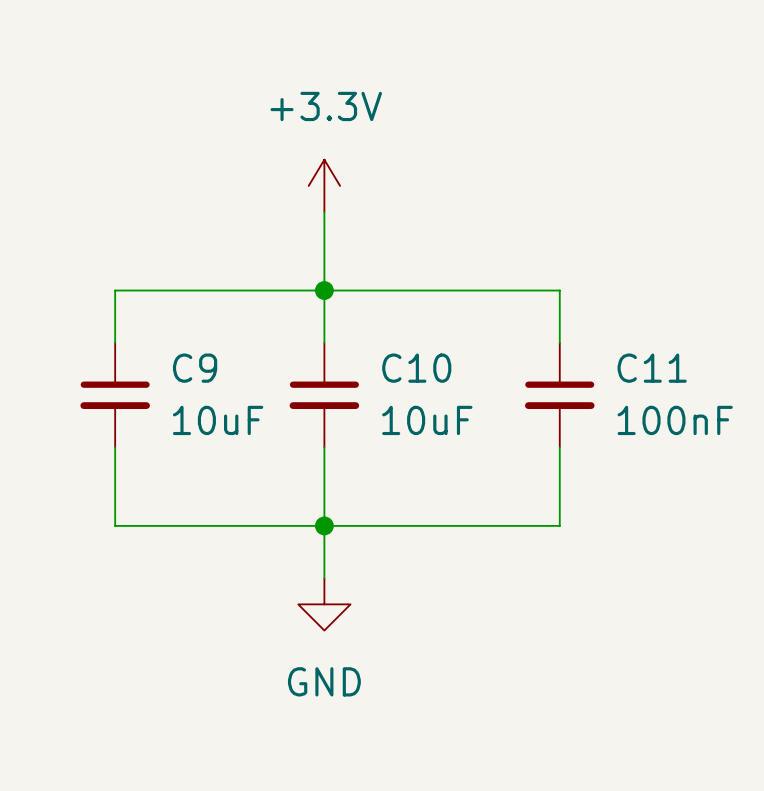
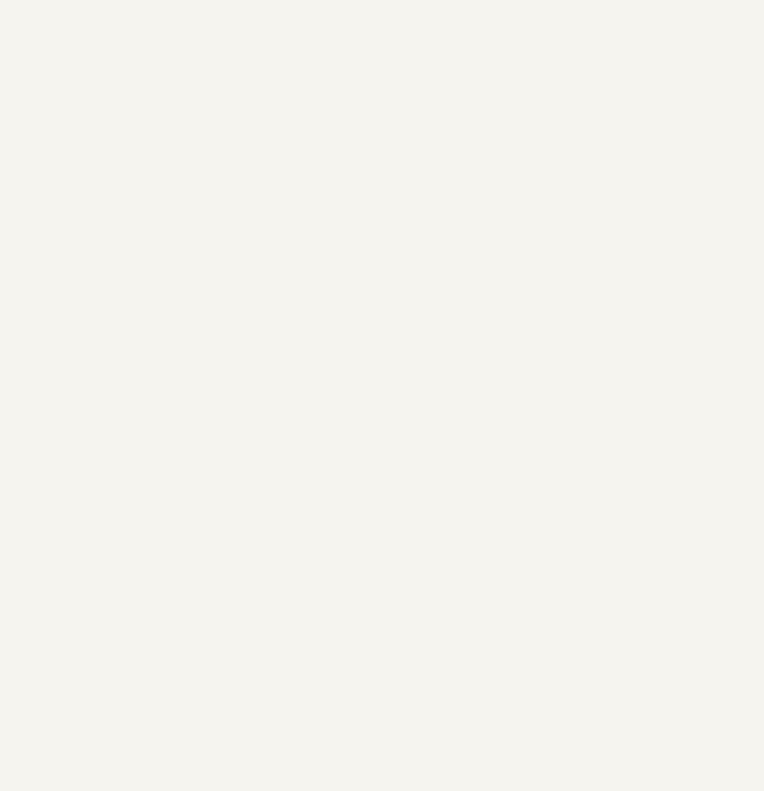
power symbol: +3.3V (324, 185) -> none
wire: (324, 212) (324, 342) -> none
junction: (324, 290) -> none
wire: (115, 342) (115, 290) (559, 290) (559, 342) -> none
C9: 10uF (115, 395) -> none
C10: 10uF (324, 395) -> none
C11: 100nF (559, 395) -> none
wire: (115, 447) (115, 525) (559, 525) (559, 447) -> none
wire: (324, 447) (324, 578) -> none
junction: (324, 525) -> none
power symbol: GND (324, 604) -> none

